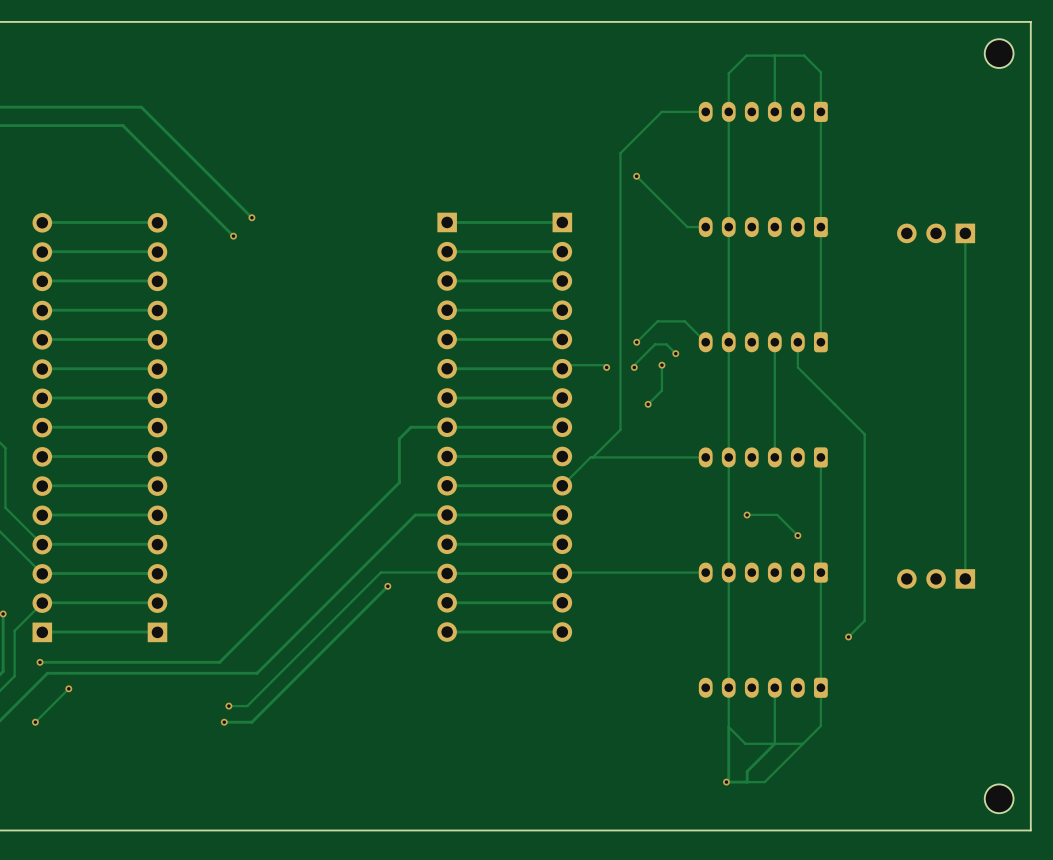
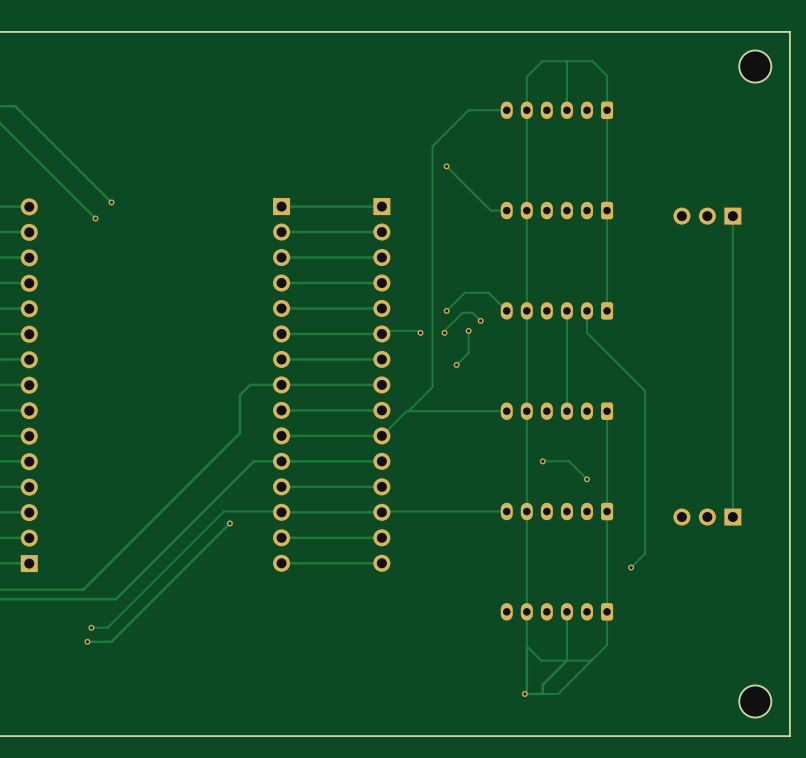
part footprint: [984, 39, 1014, 69] -> [739, 50, 772, 83]
part footprint: [984, 784, 1014, 814] -> [739, 685, 772, 718]

